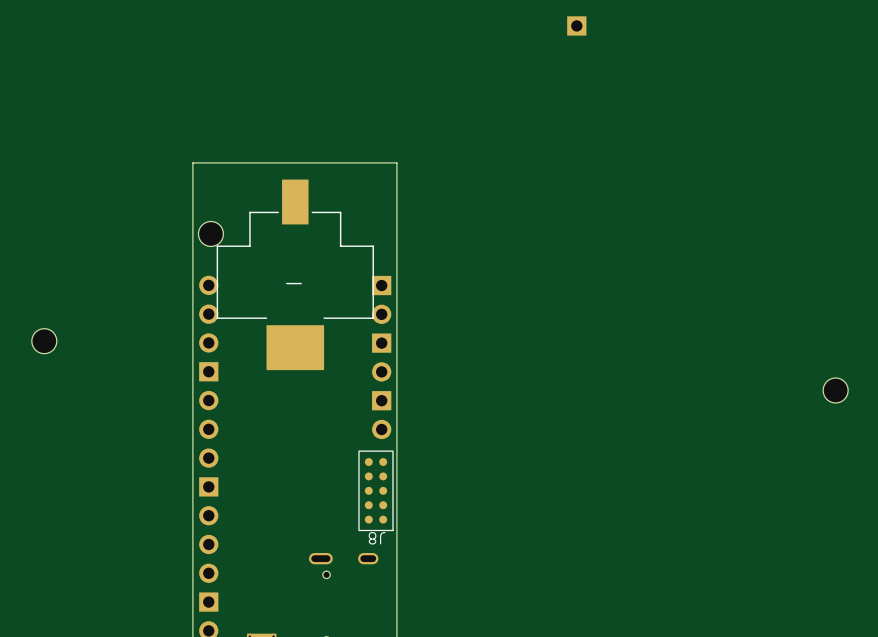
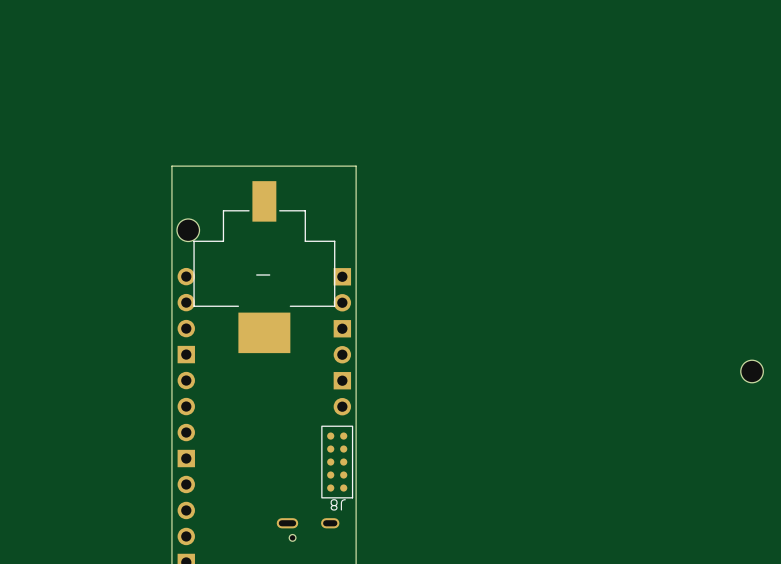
part: (576, 25) -> none
part: (44, 341) -> none

